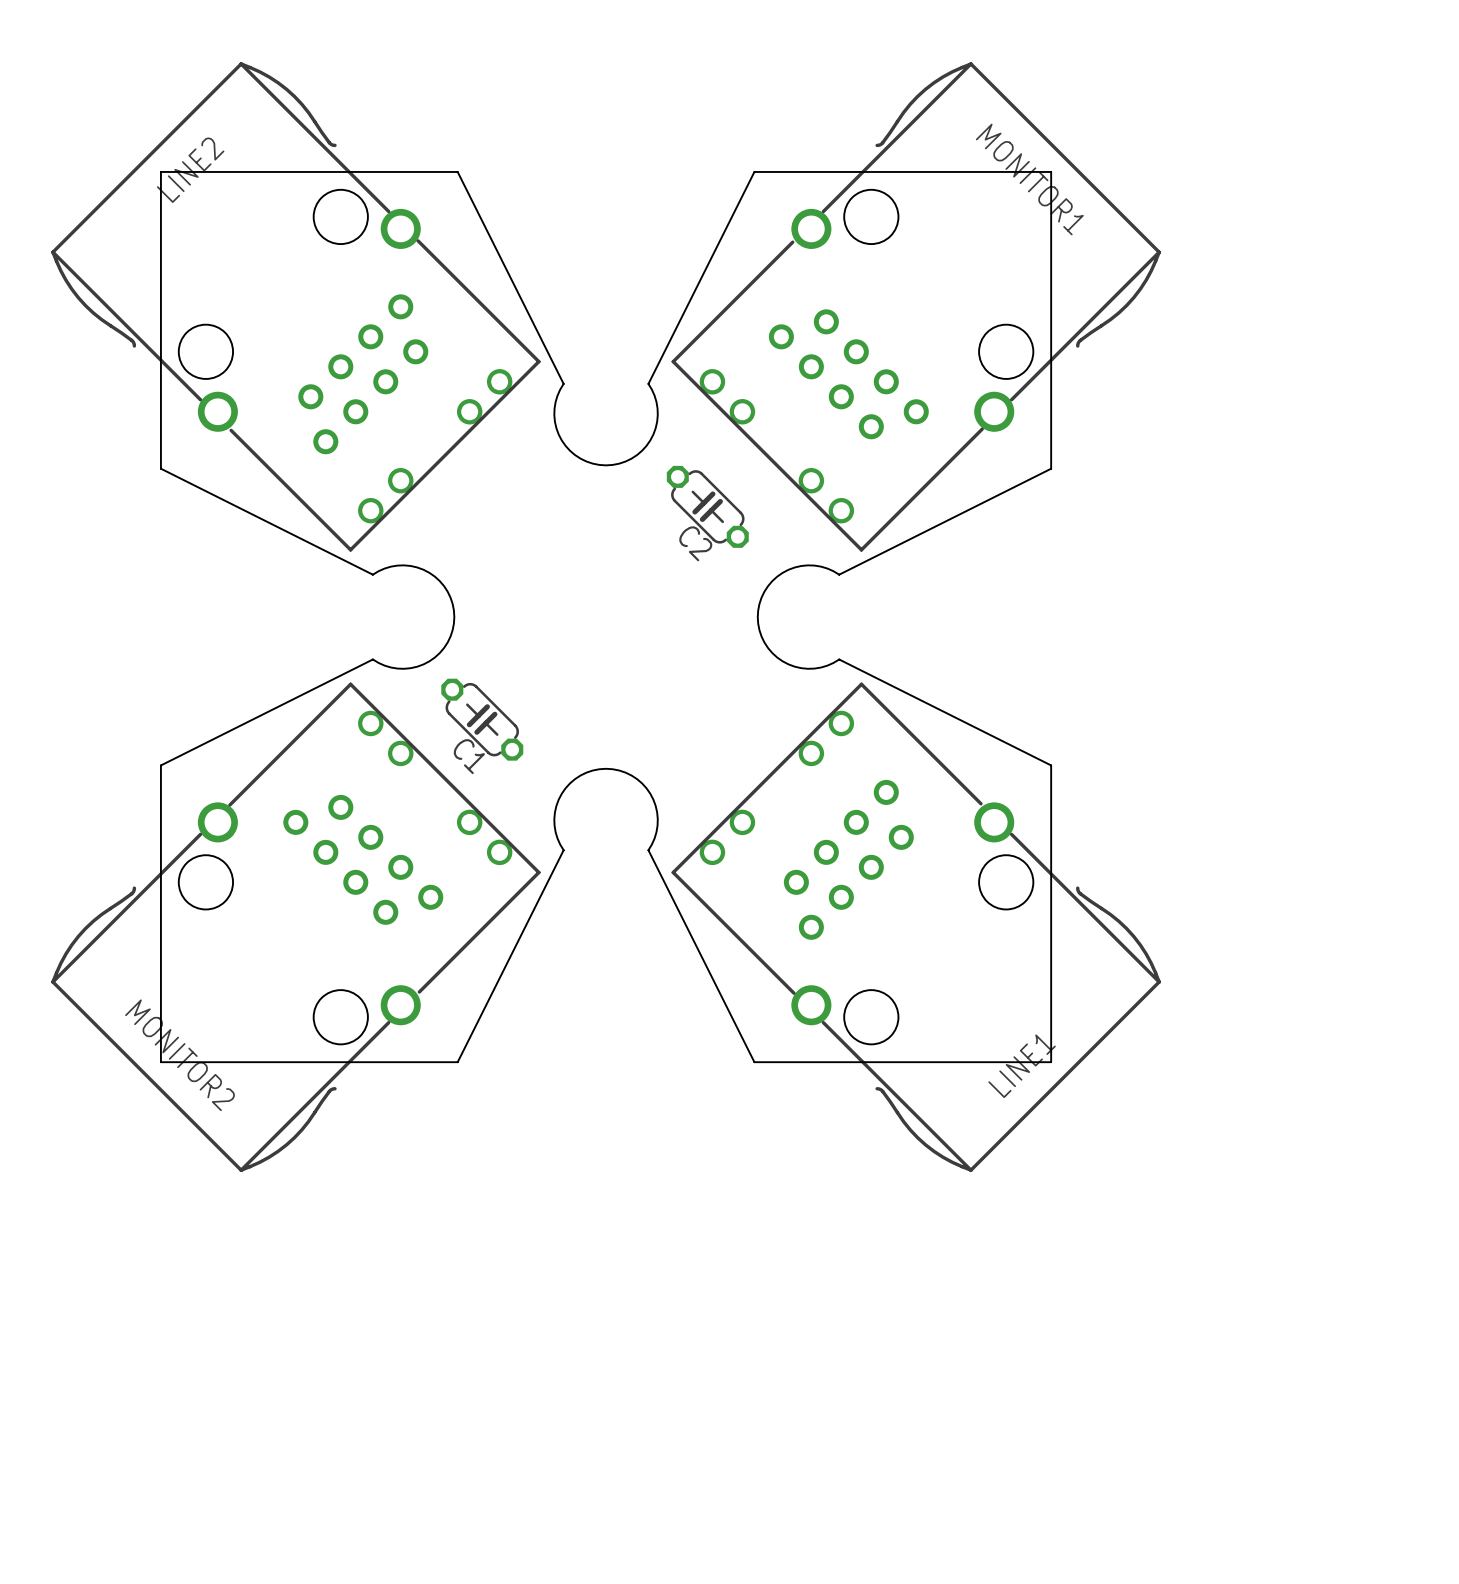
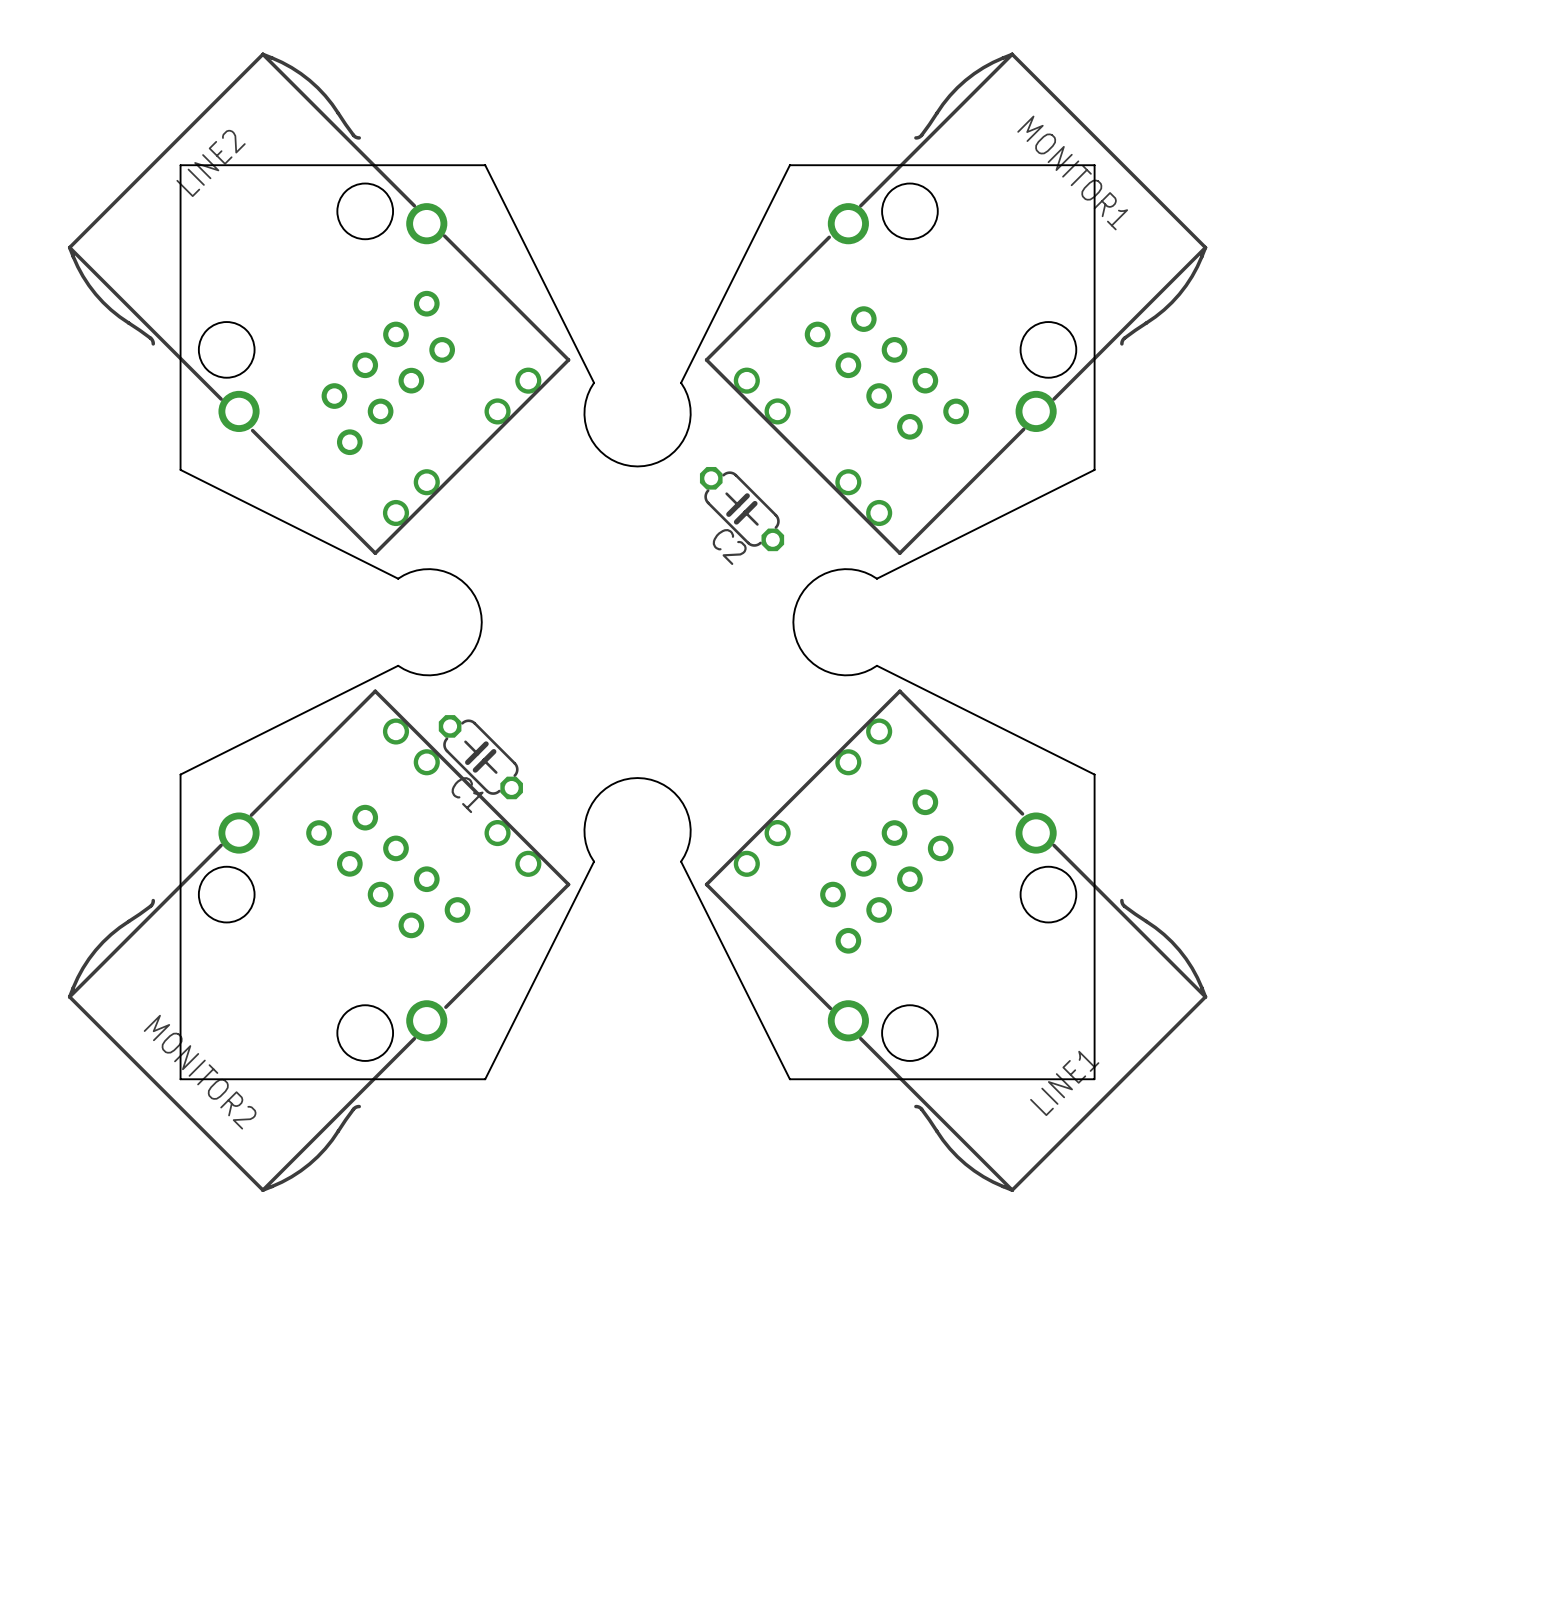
C1 position: (482, 719) -> (480, 757)

